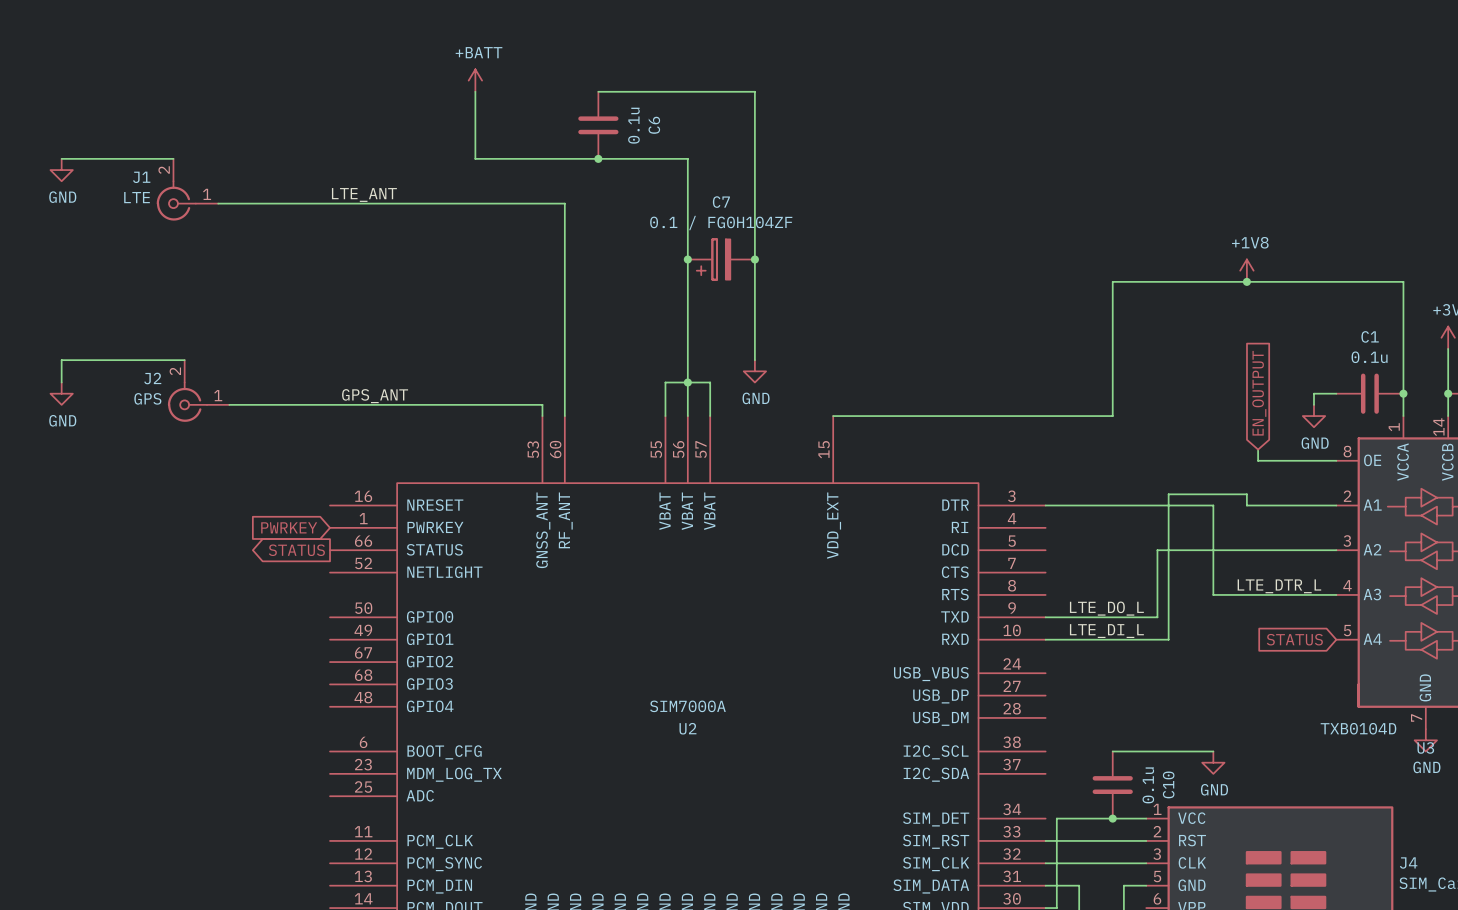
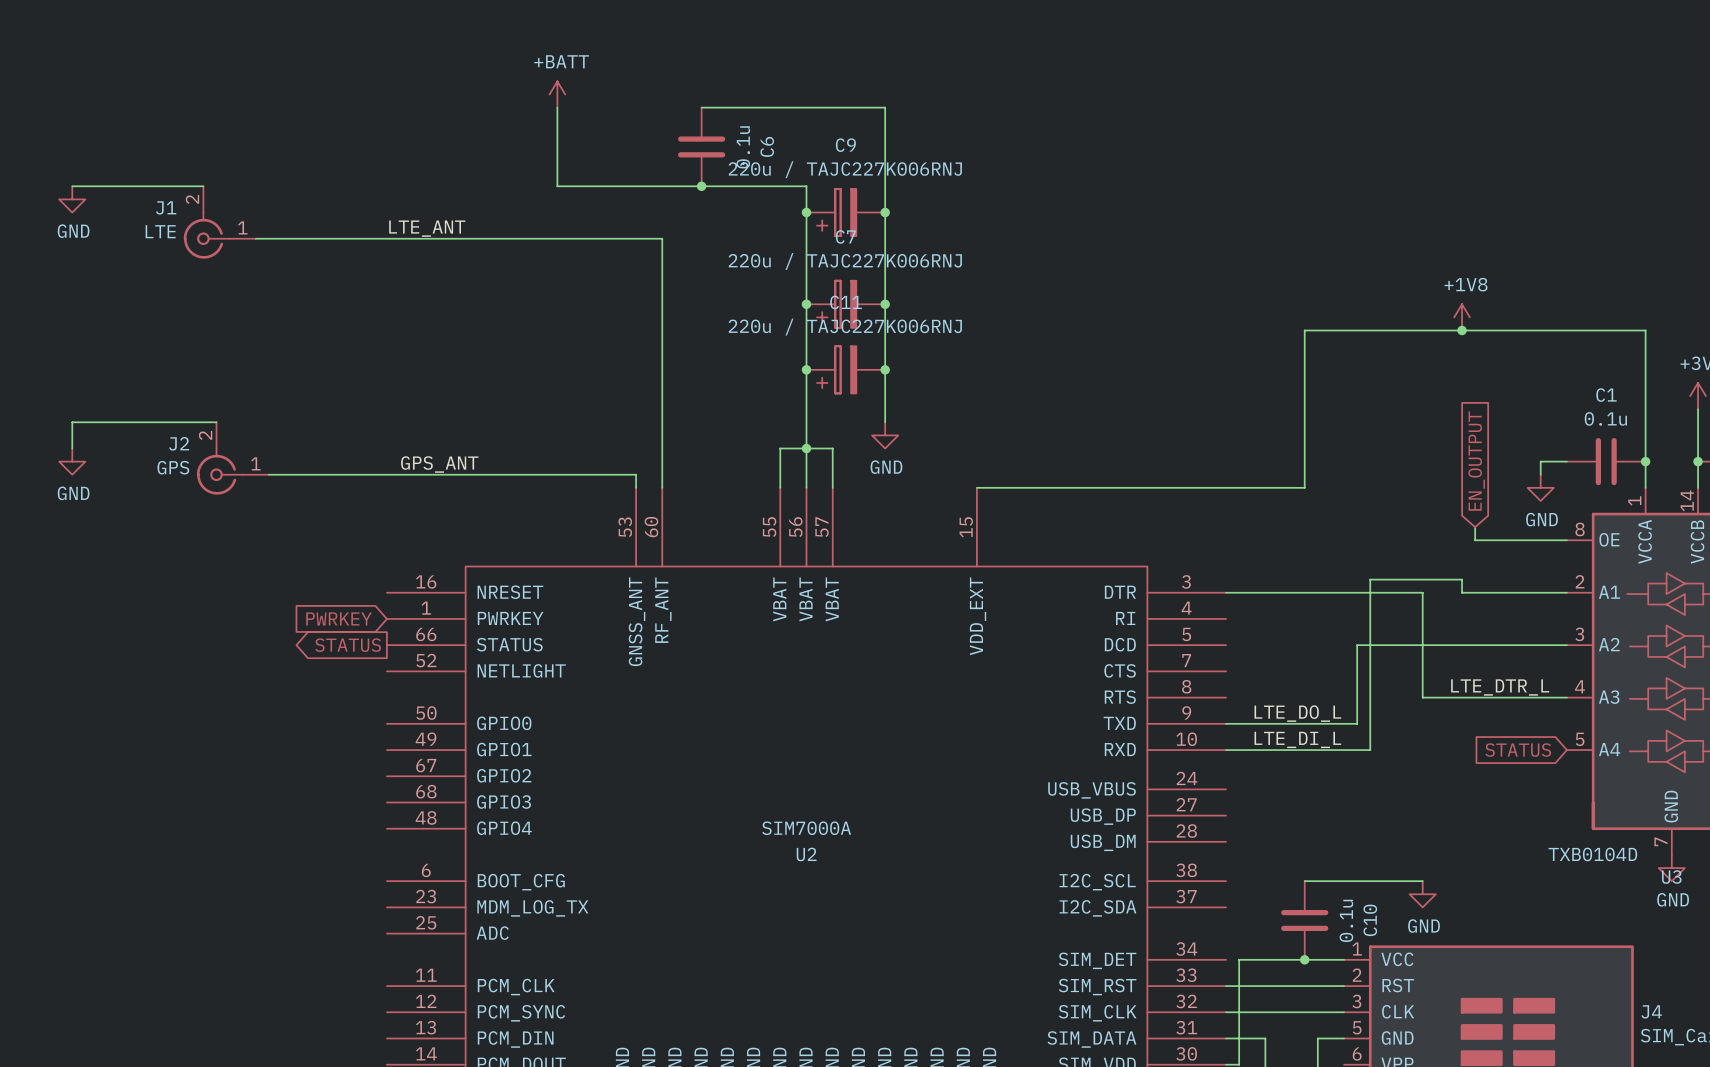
junction: none -> (806, 212)
C9: none -> 220u / TAJC227K006RNJ (845, 212)
junction: none -> (885, 212)
C7 value: 0.1 / FG0H104ZF (721, 223) -> 220u / TAJC227K006RNJ (845, 261)
junction: none -> (806, 369)
C11: none -> 220u / TAJC227K006RNJ (845, 369)
junction: none -> (885, 369)

